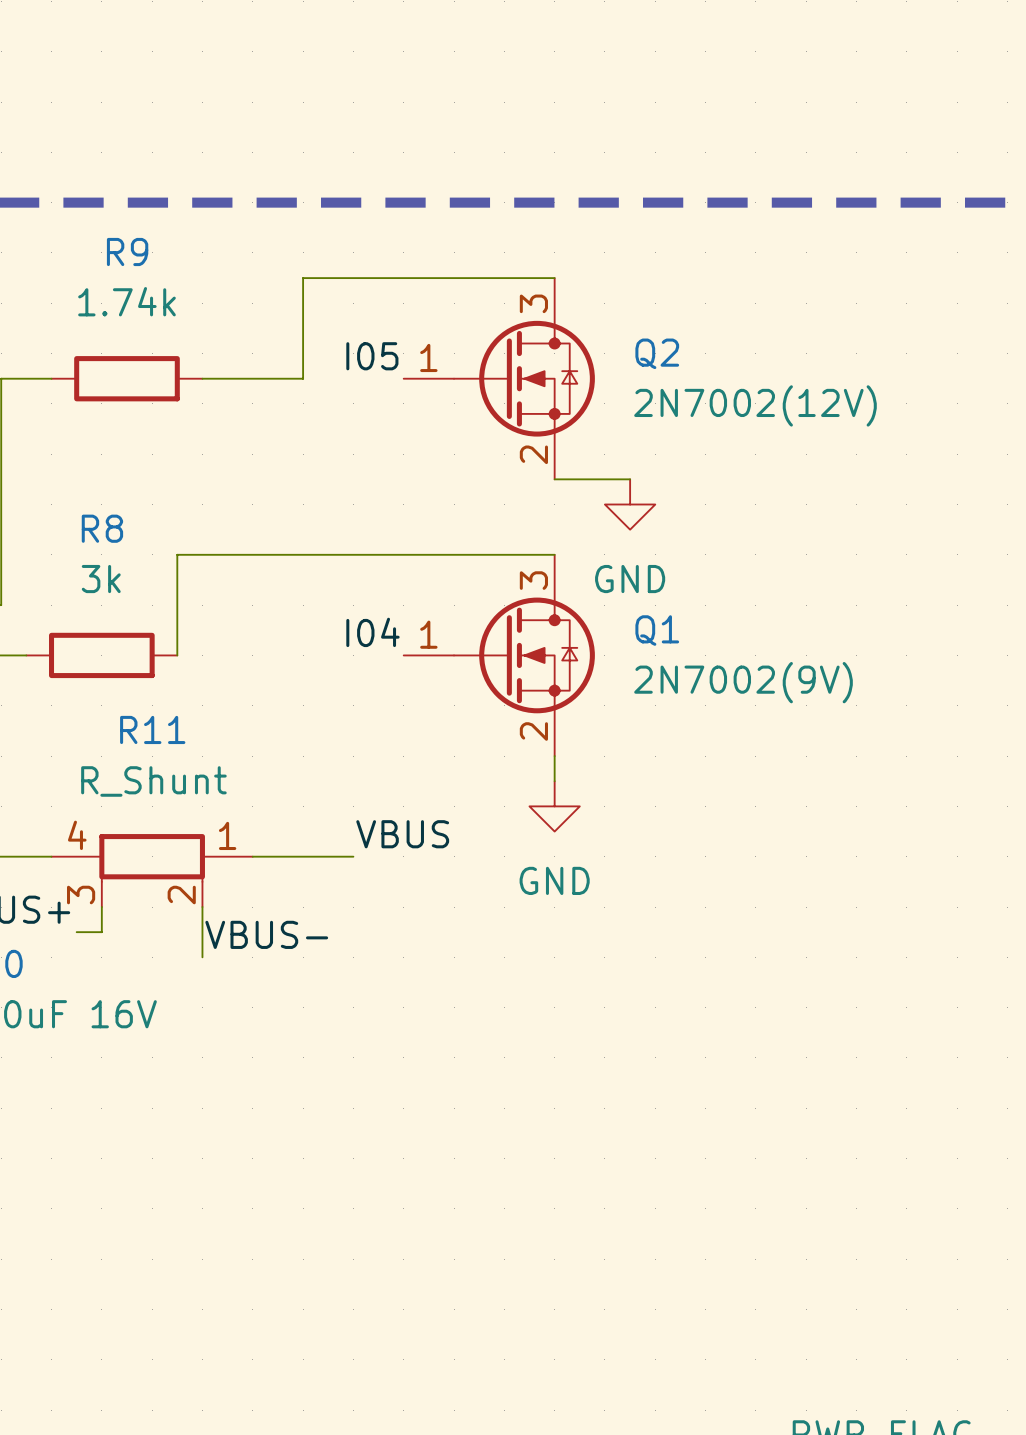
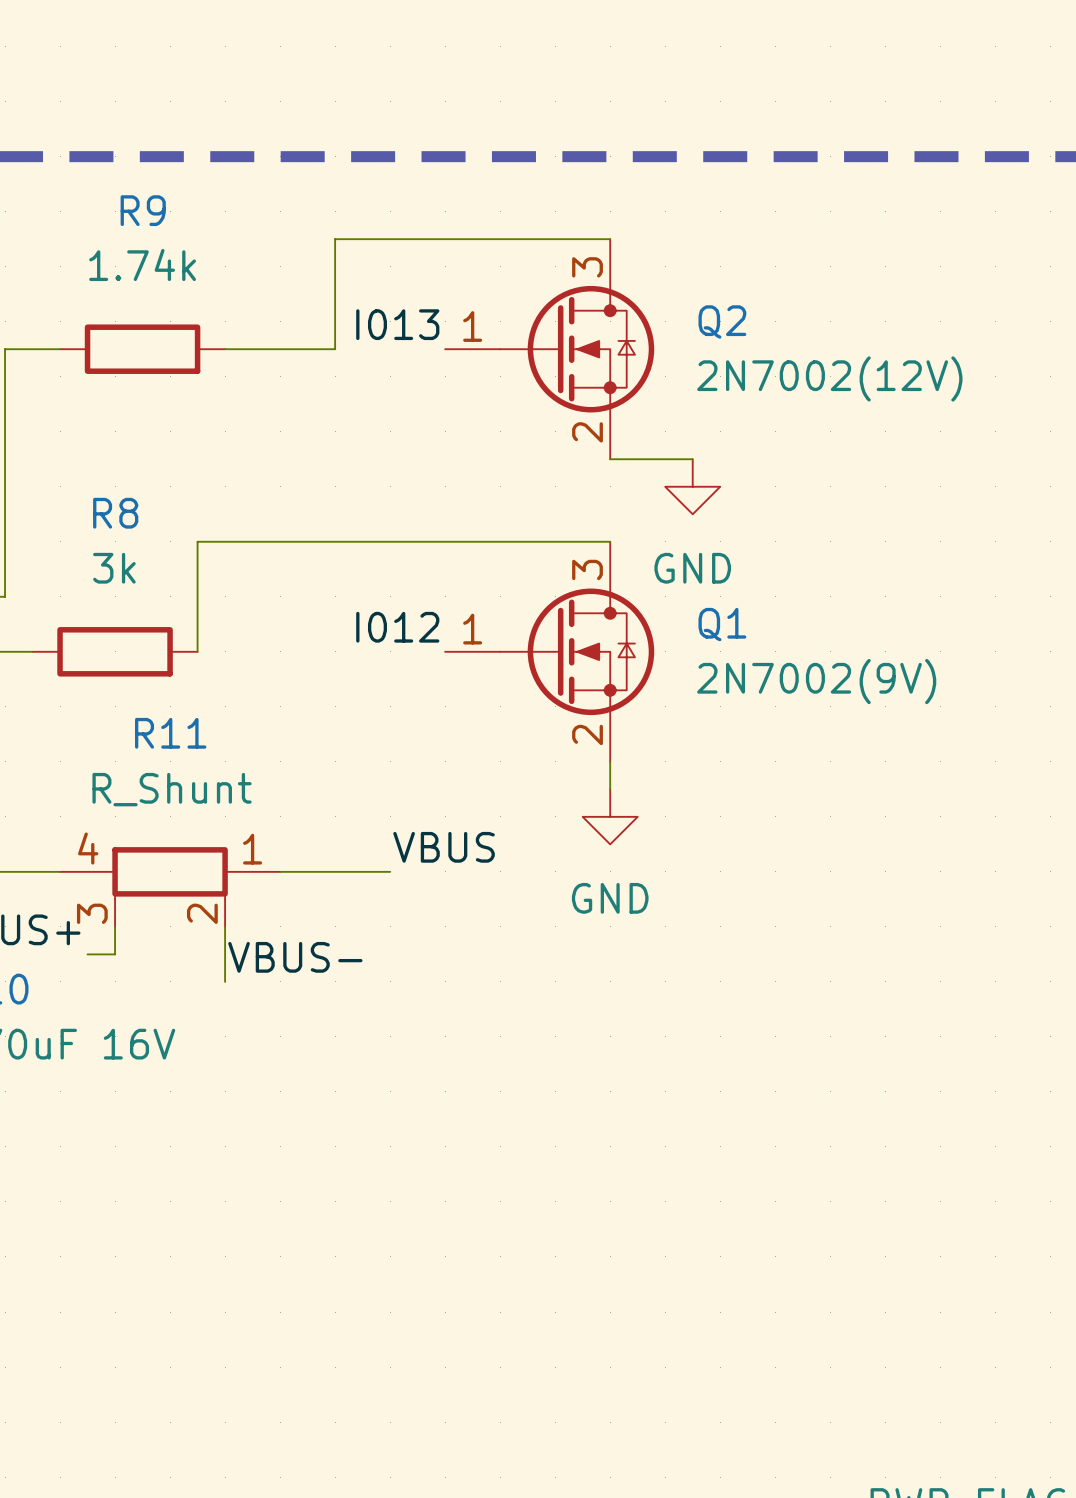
label: I05 (372, 356) -> I013 (397, 324)
label: I04 (372, 632) -> I012 (397, 627)

